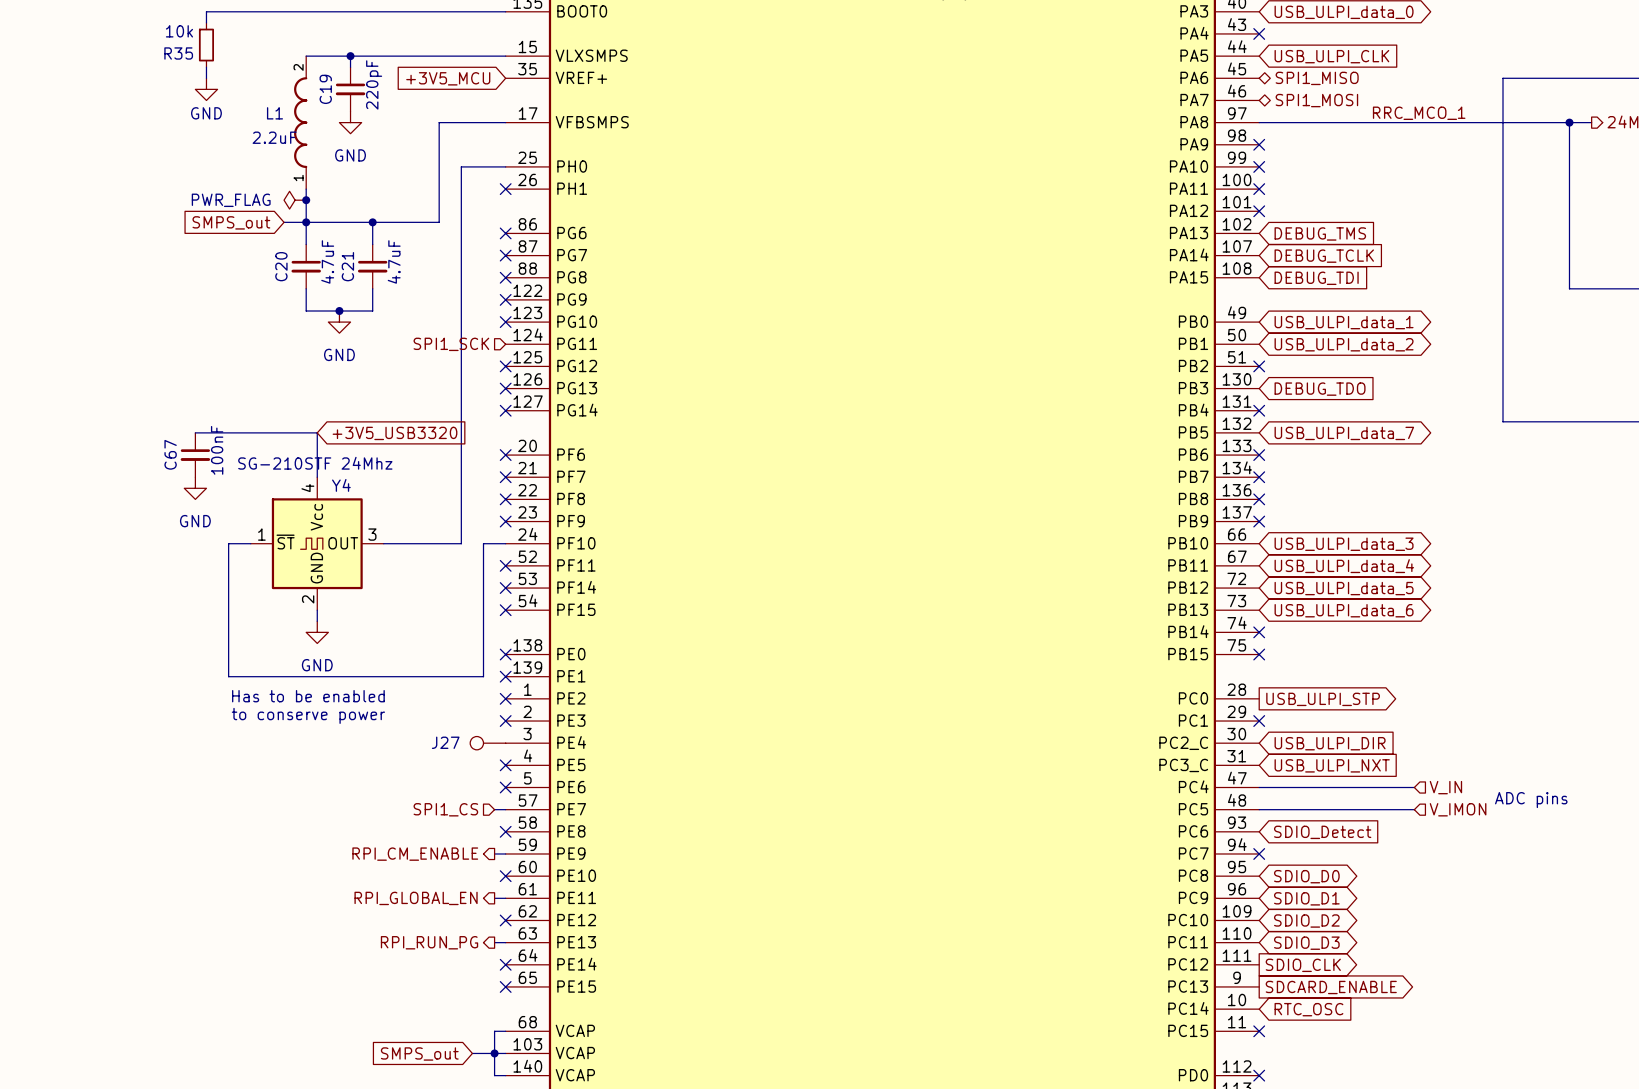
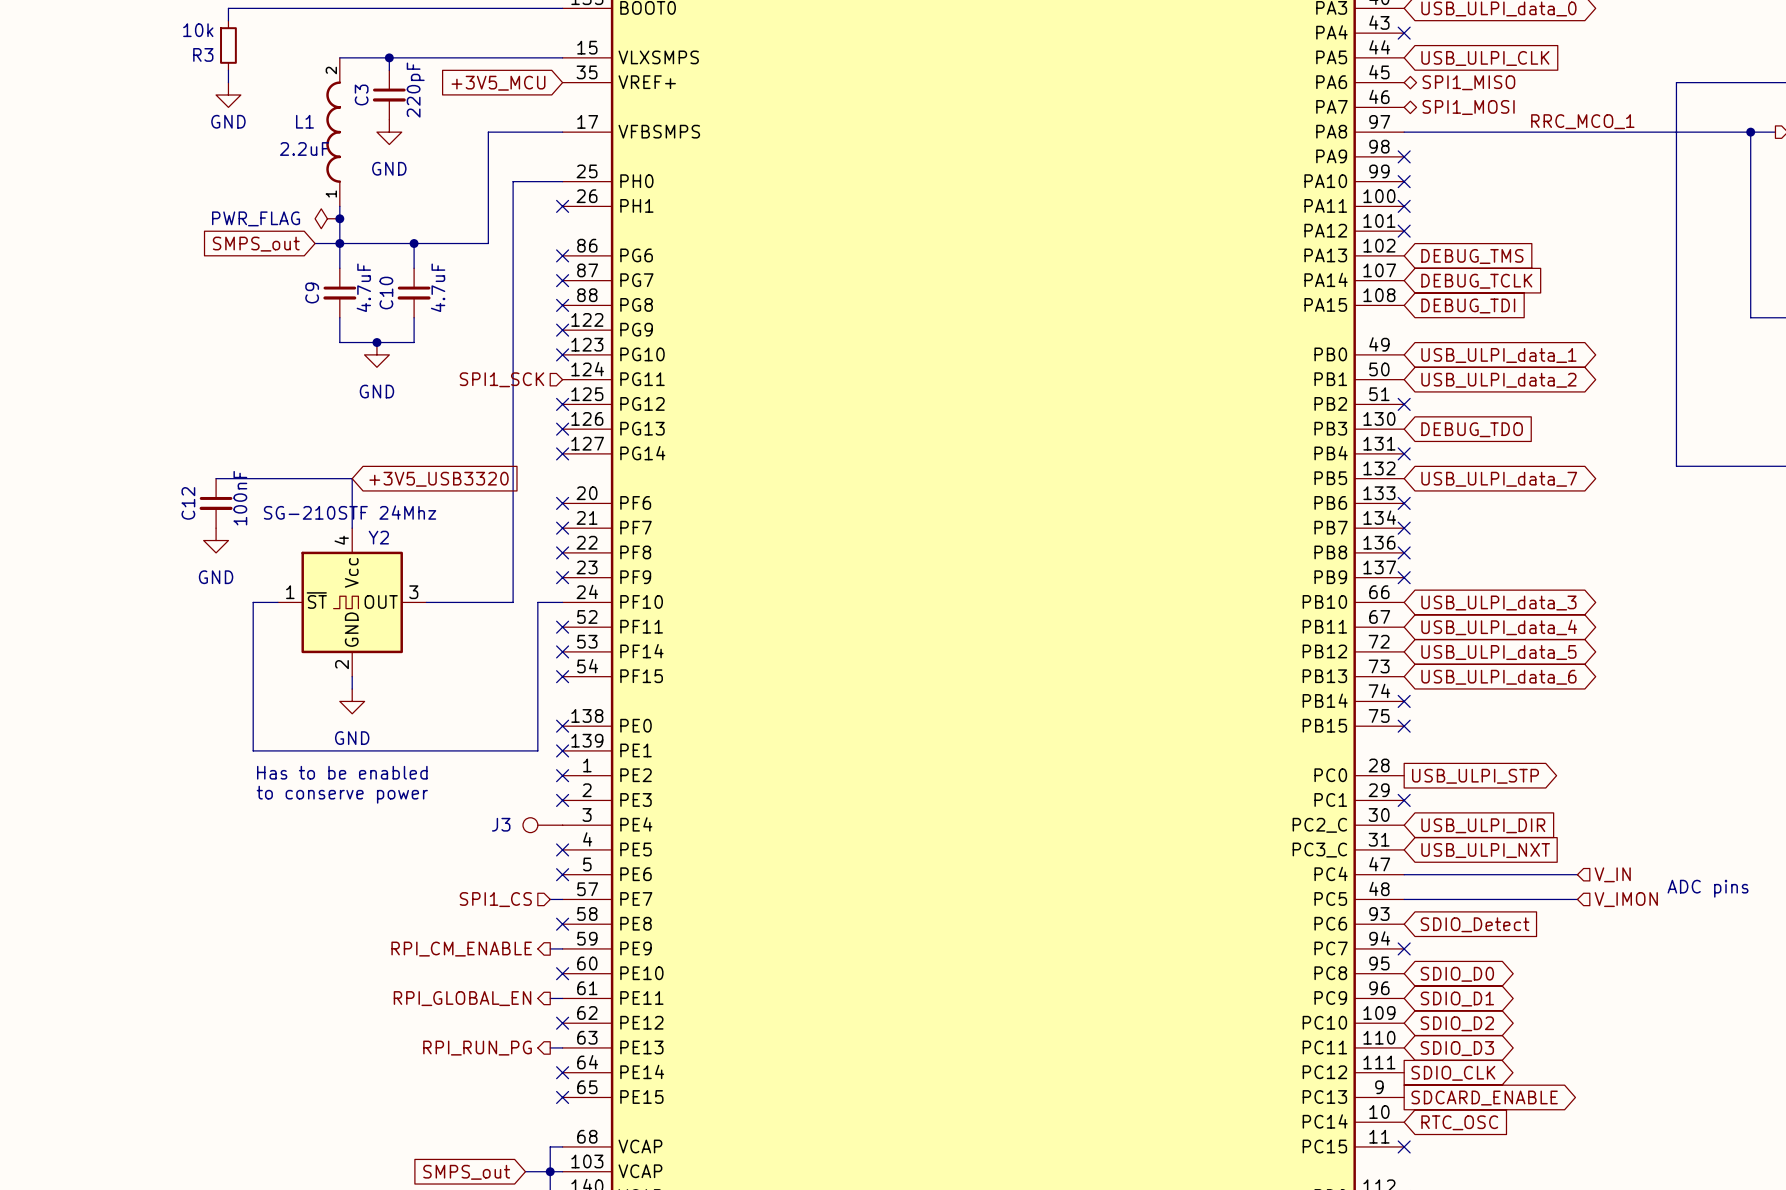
R35 name: R35 (178, 53) -> R3 (203, 54)
C19 name: C19 (325, 89) -> C3 (361, 95)
C20 name: C20 (281, 266) -> C9 (312, 293)
C21 name: C21 (347, 266) -> C10 (386, 293)
C67 name: C67 (170, 454) -> C12 (188, 503)
Y4 name: Y4 (341, 485) -> Y2 (378, 537)
J27 name: J27 (445, 742) -> J3 (501, 824)

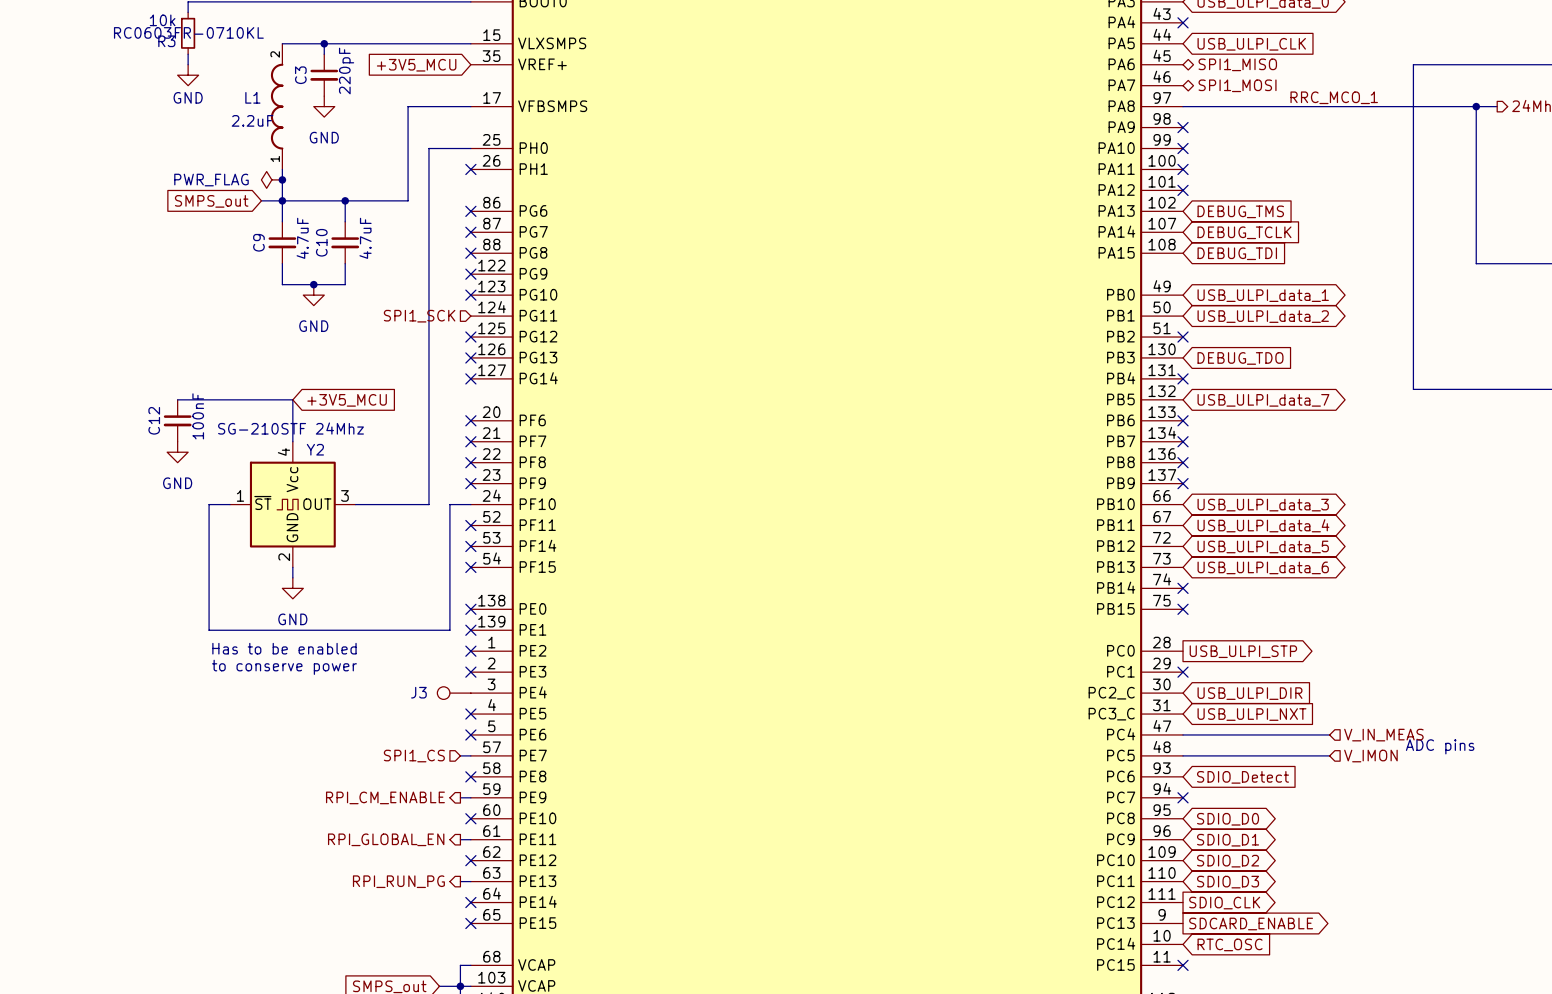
R3 text: none -> RC0603FR-0710KL (188, 32)
global label: +3V5_USB3320 (439, 479) -> +3V5_MCU (347, 400)
hierarchical label: V_IN (1612, 874) -> V_IN_MEAS (1383, 735)

